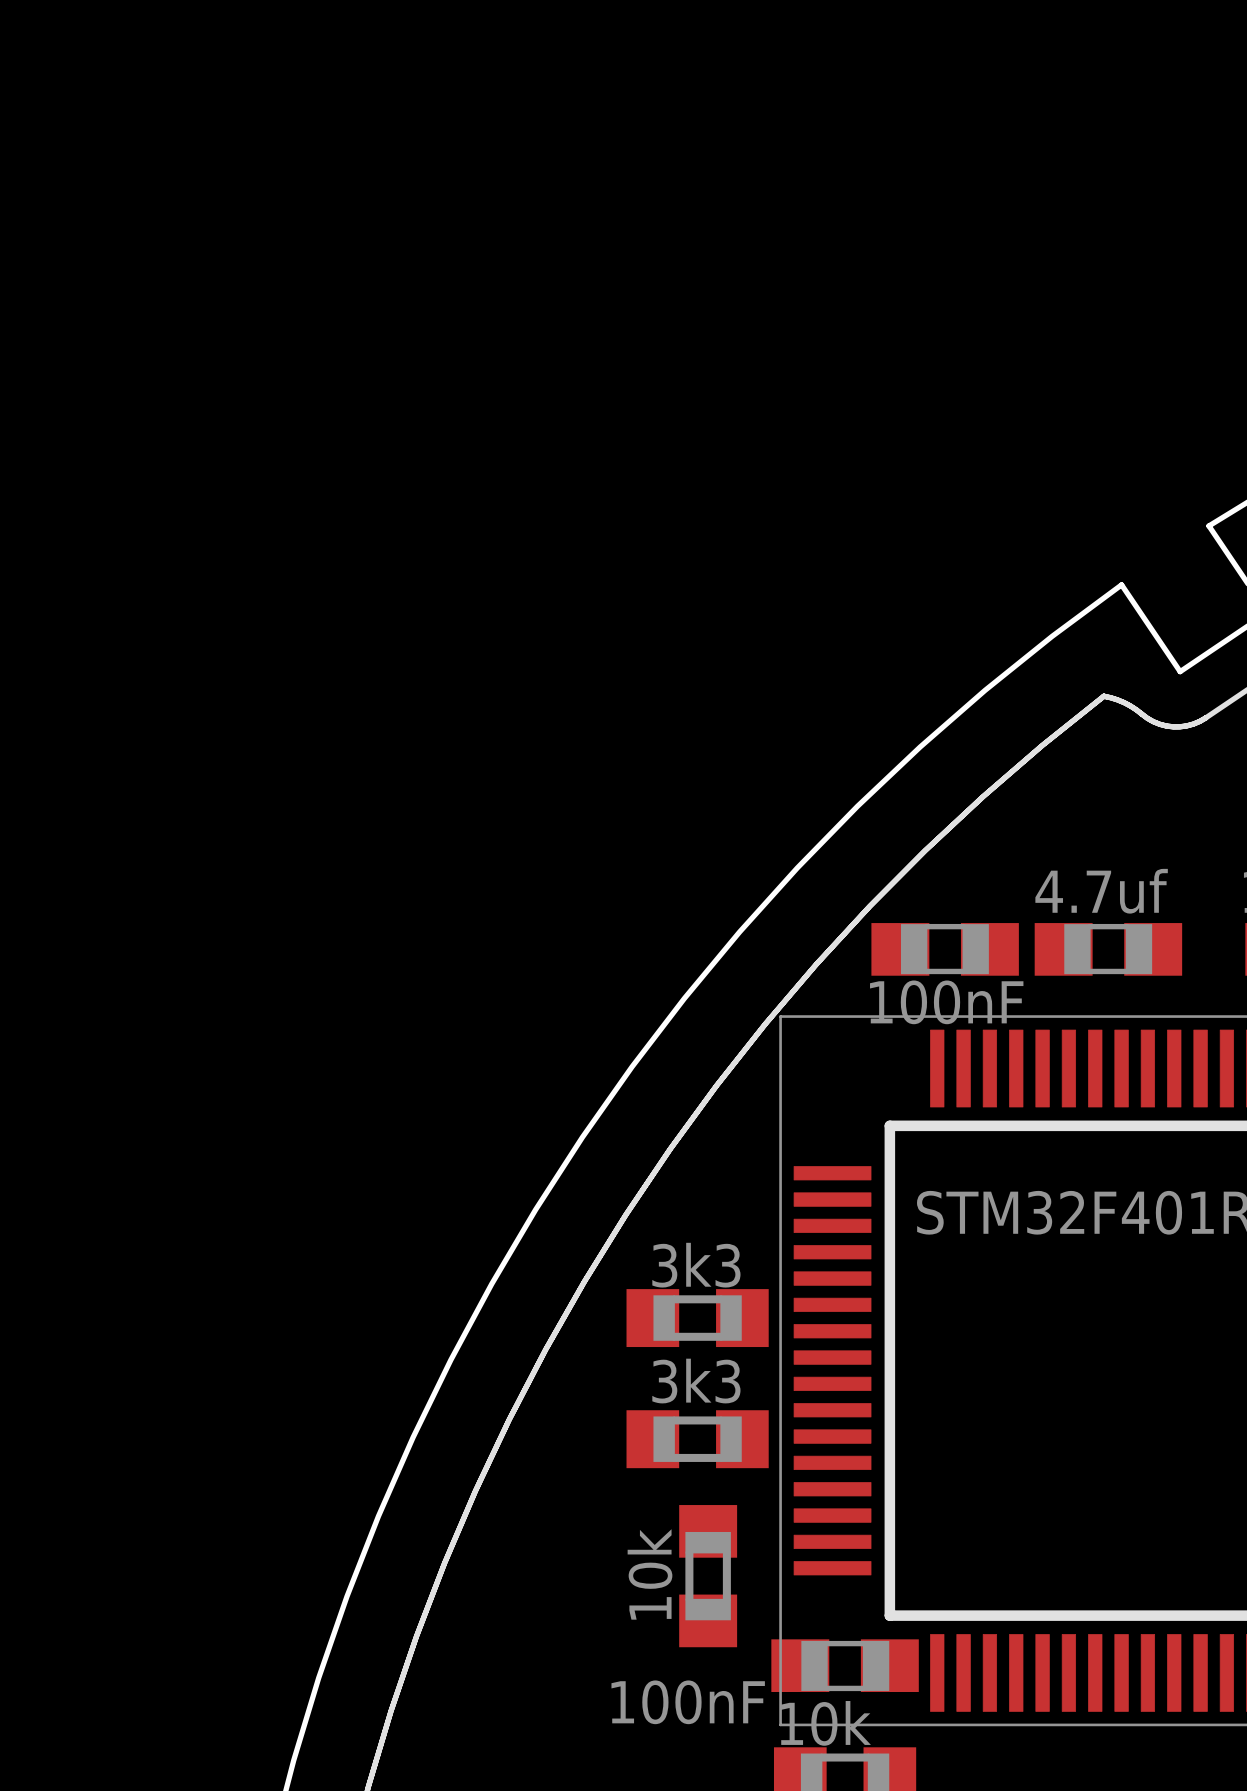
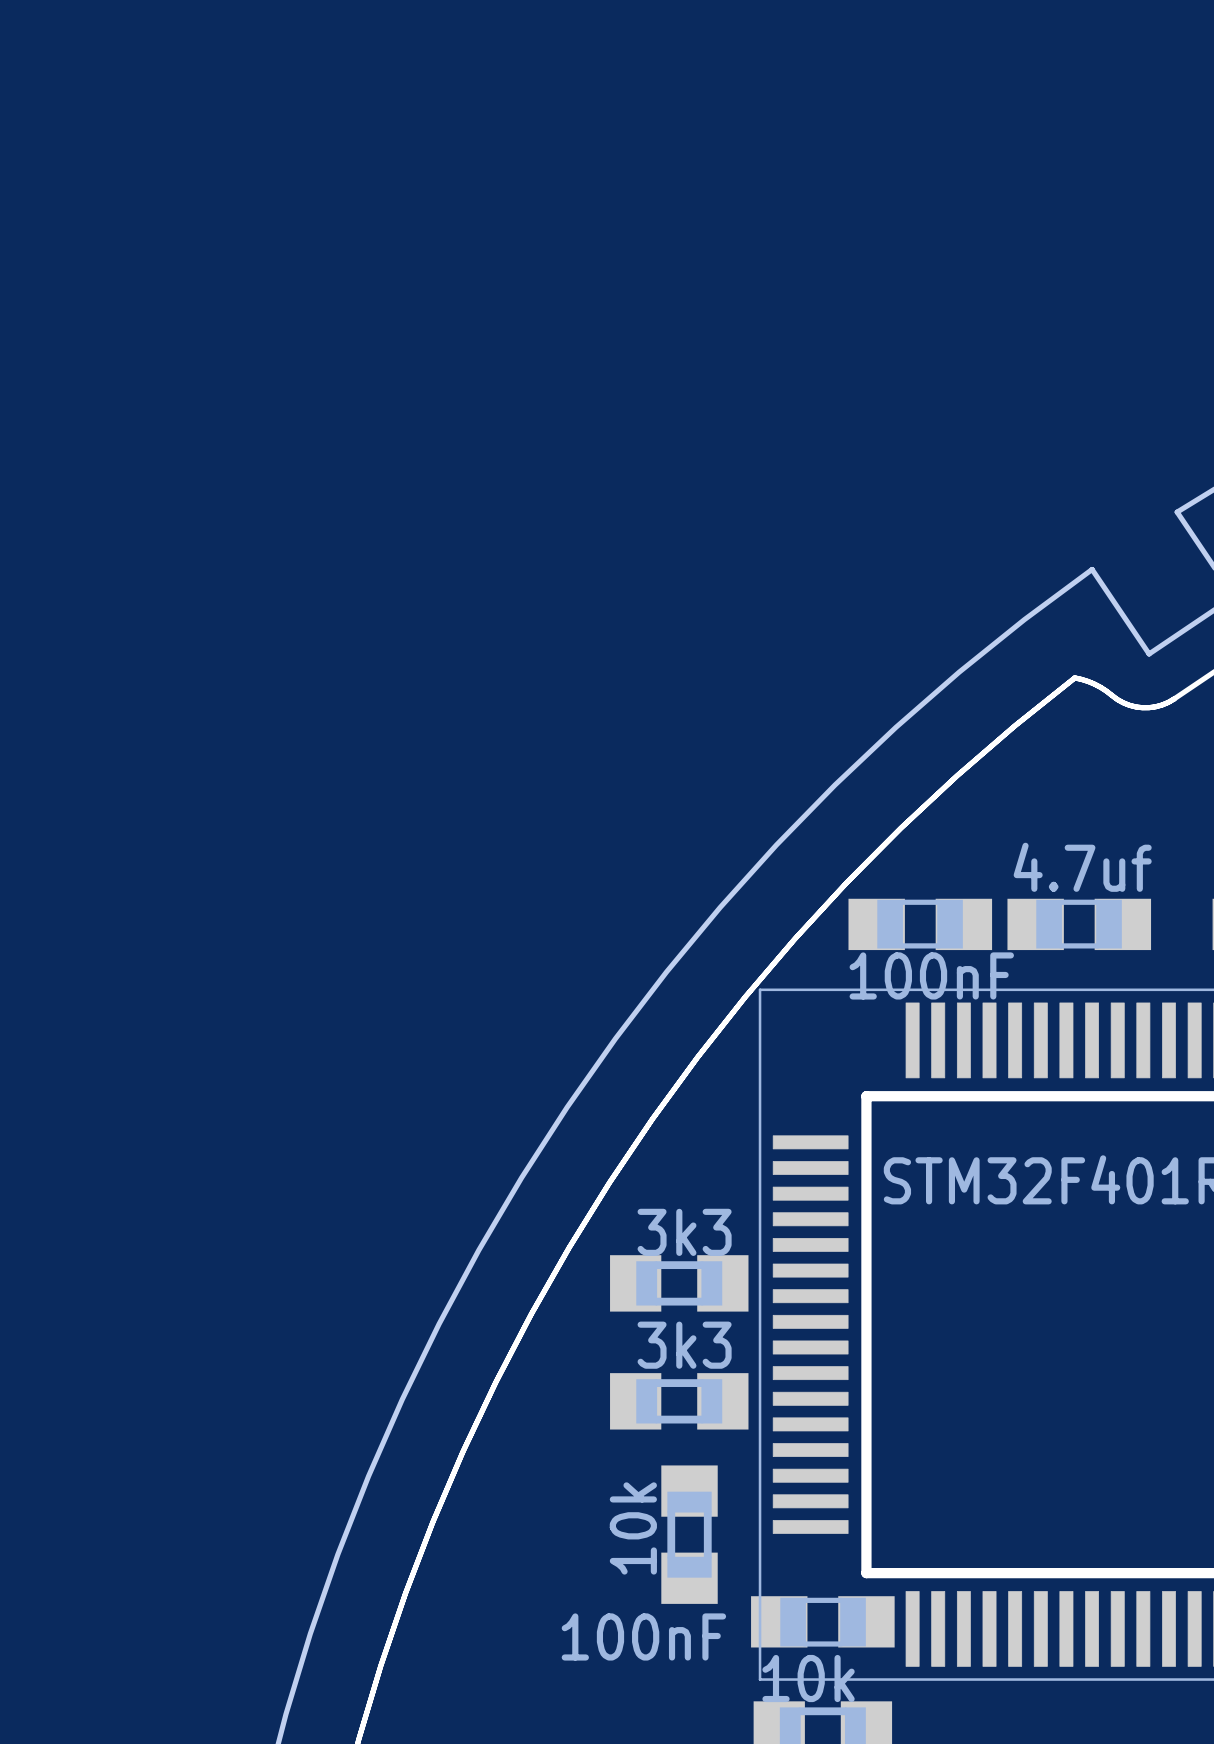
part value position: 100nF (688, 1702) -> 100nF (643, 1636)

